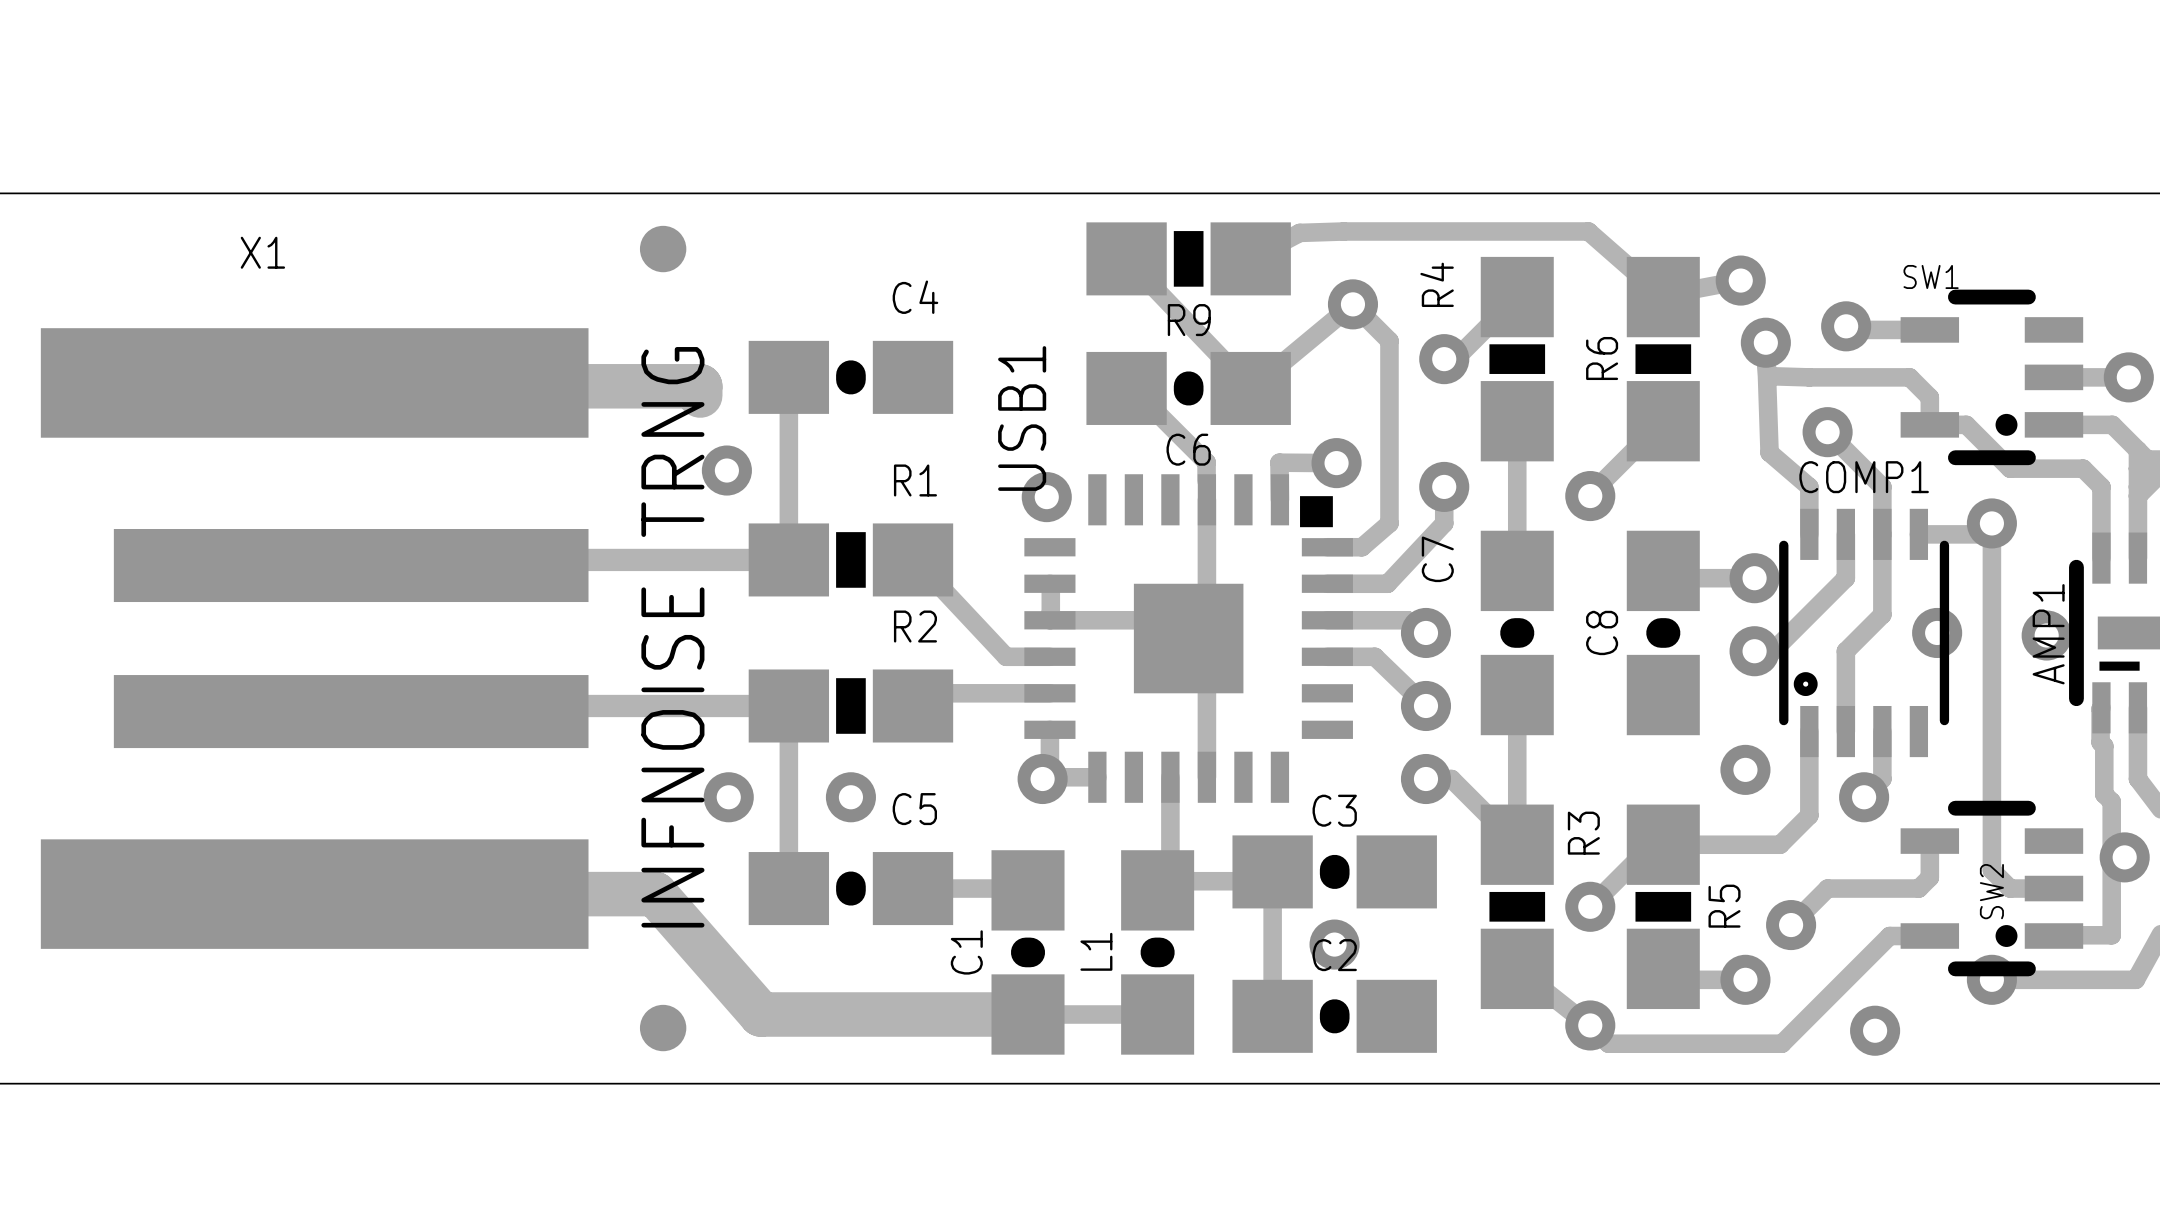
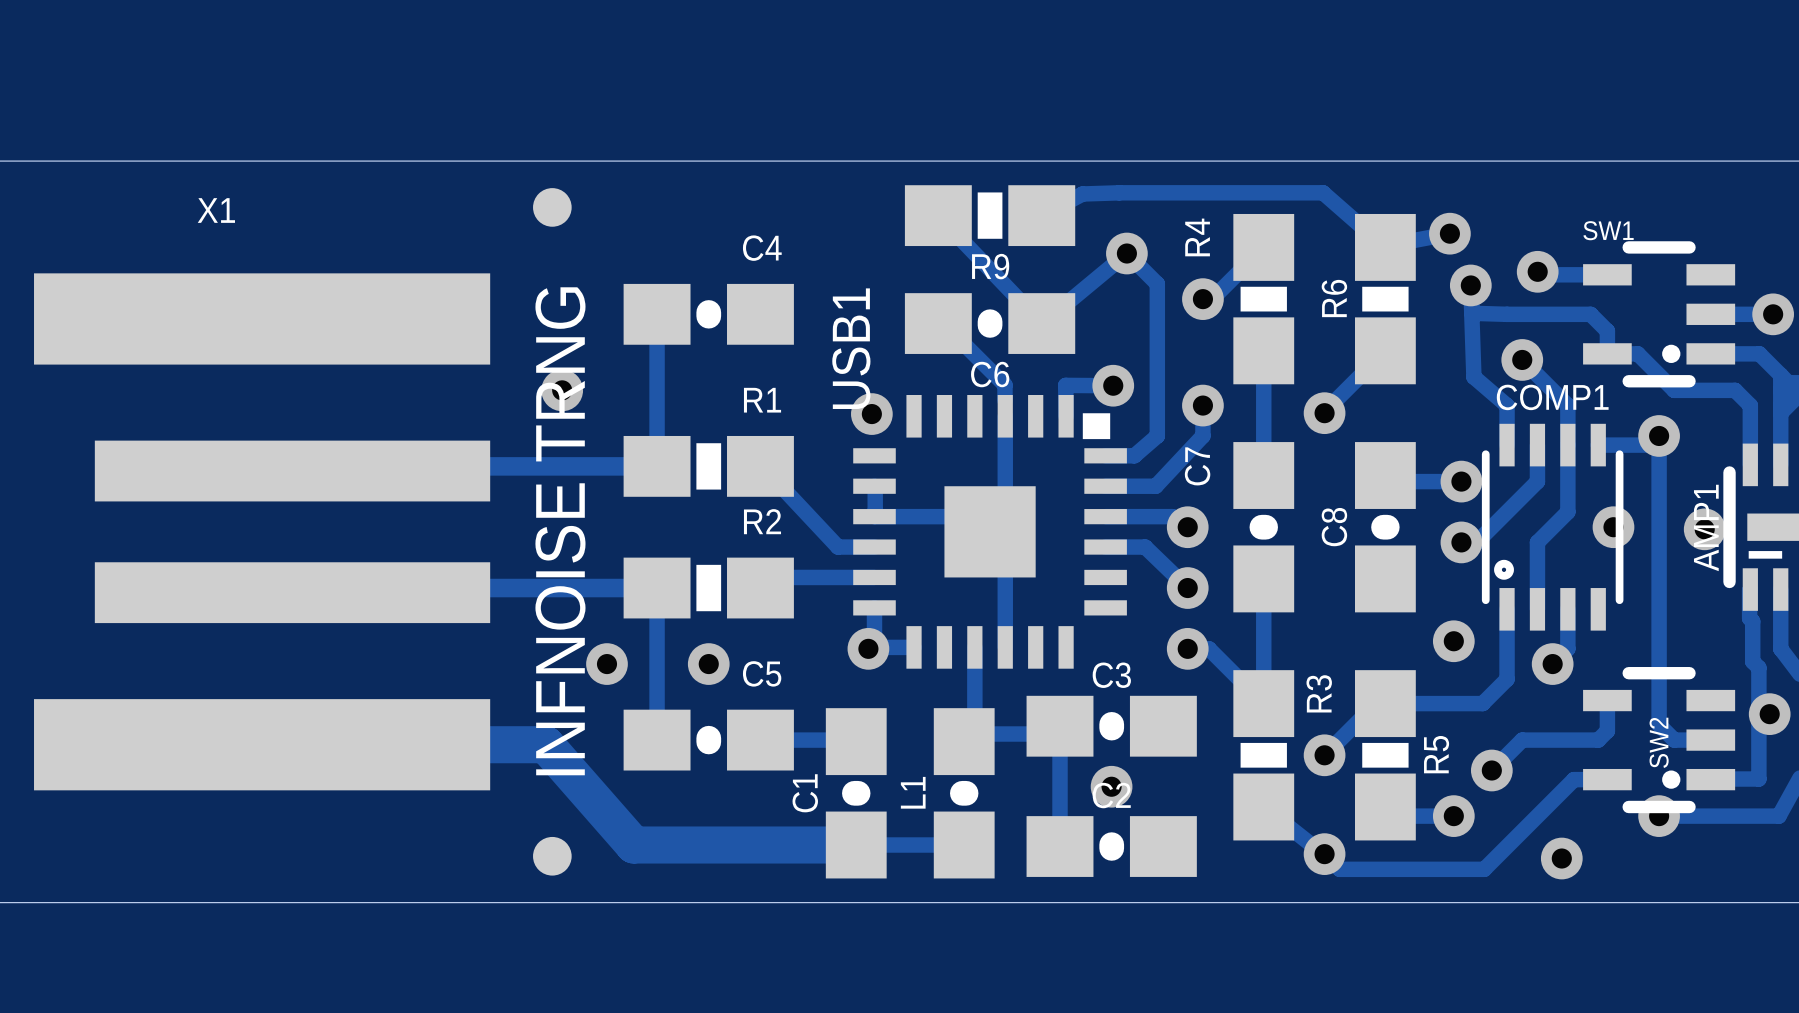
track: (561, 386) (700, 386) (700, 395) -> none
via position: (726, 470) -> (562, 390)

